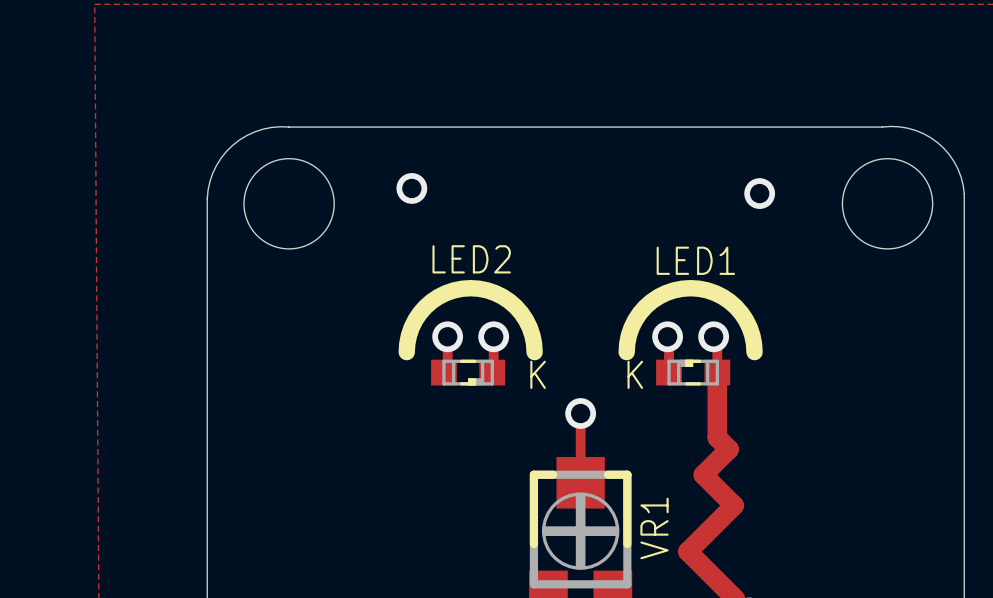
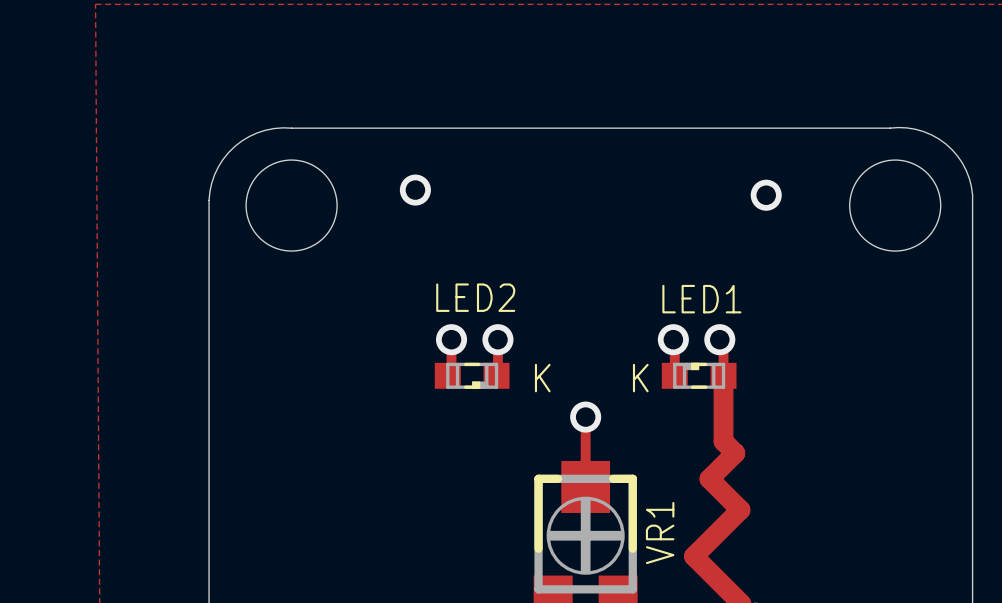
LED2 name position: LED2 (471, 259) -> LED2 (475, 297)
LED1 name position: LED1 (695, 260) -> LED1 (701, 299)
line: (406, 352) (411, 327) (425, 306) (446, 293) (470, 288) (495, 293) (515, 306) (529, 327) (534, 352) -> none
line: (626, 352) (631, 327) (645, 306) (666, 293) (690, 288) (715, 293) (735, 306) (749, 327) (754, 352) -> none

